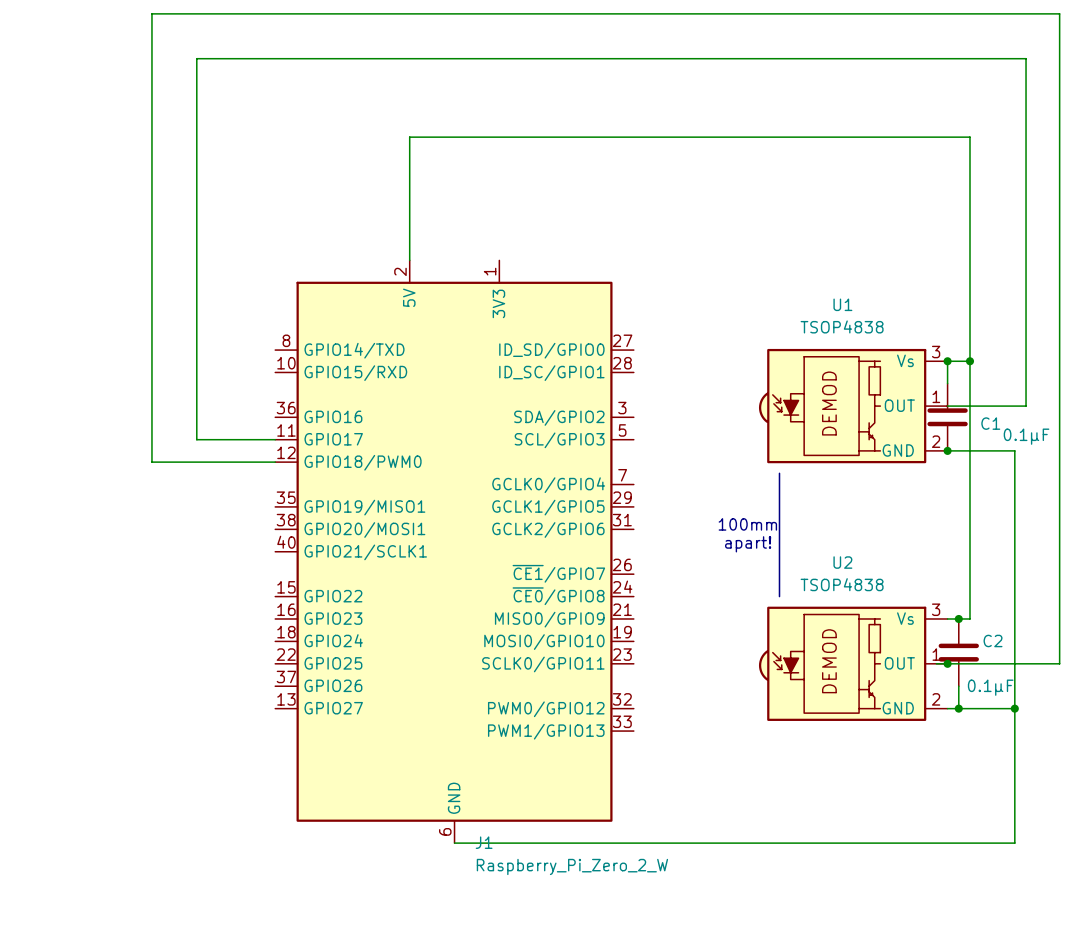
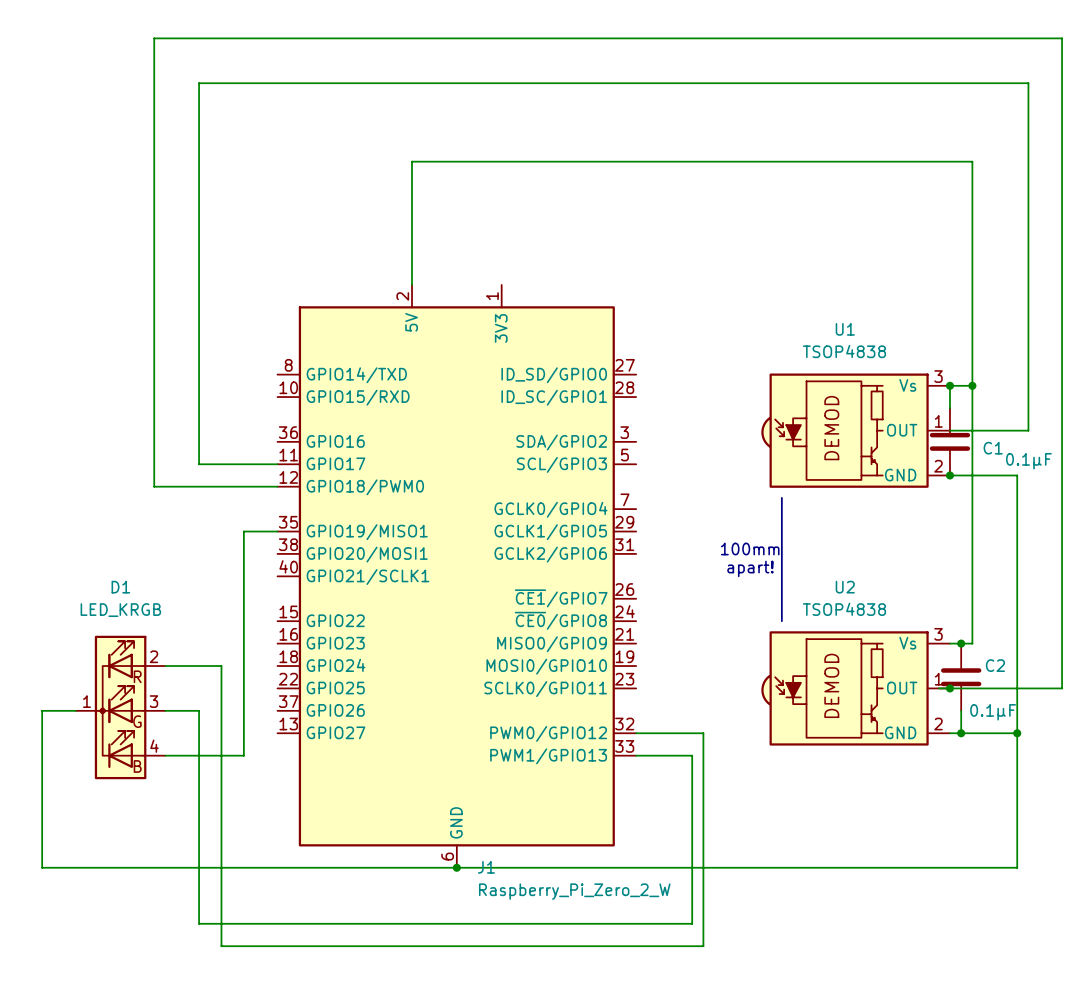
wire: none -> (277, 531) (243, 531) (243, 755) (165, 755)
wire: none -> (165, 666) (221, 666) (221, 946) (703, 946) (703, 733) (636, 733)
D1: none -> LED_KRGB (120, 707)
wire: none -> (75, 710) (42, 710) (42, 867) (456, 867)
wire: none -> (165, 710) (199, 710) (199, 923) (692, 923) (692, 755) (636, 755)
junction: none -> (456, 867)

